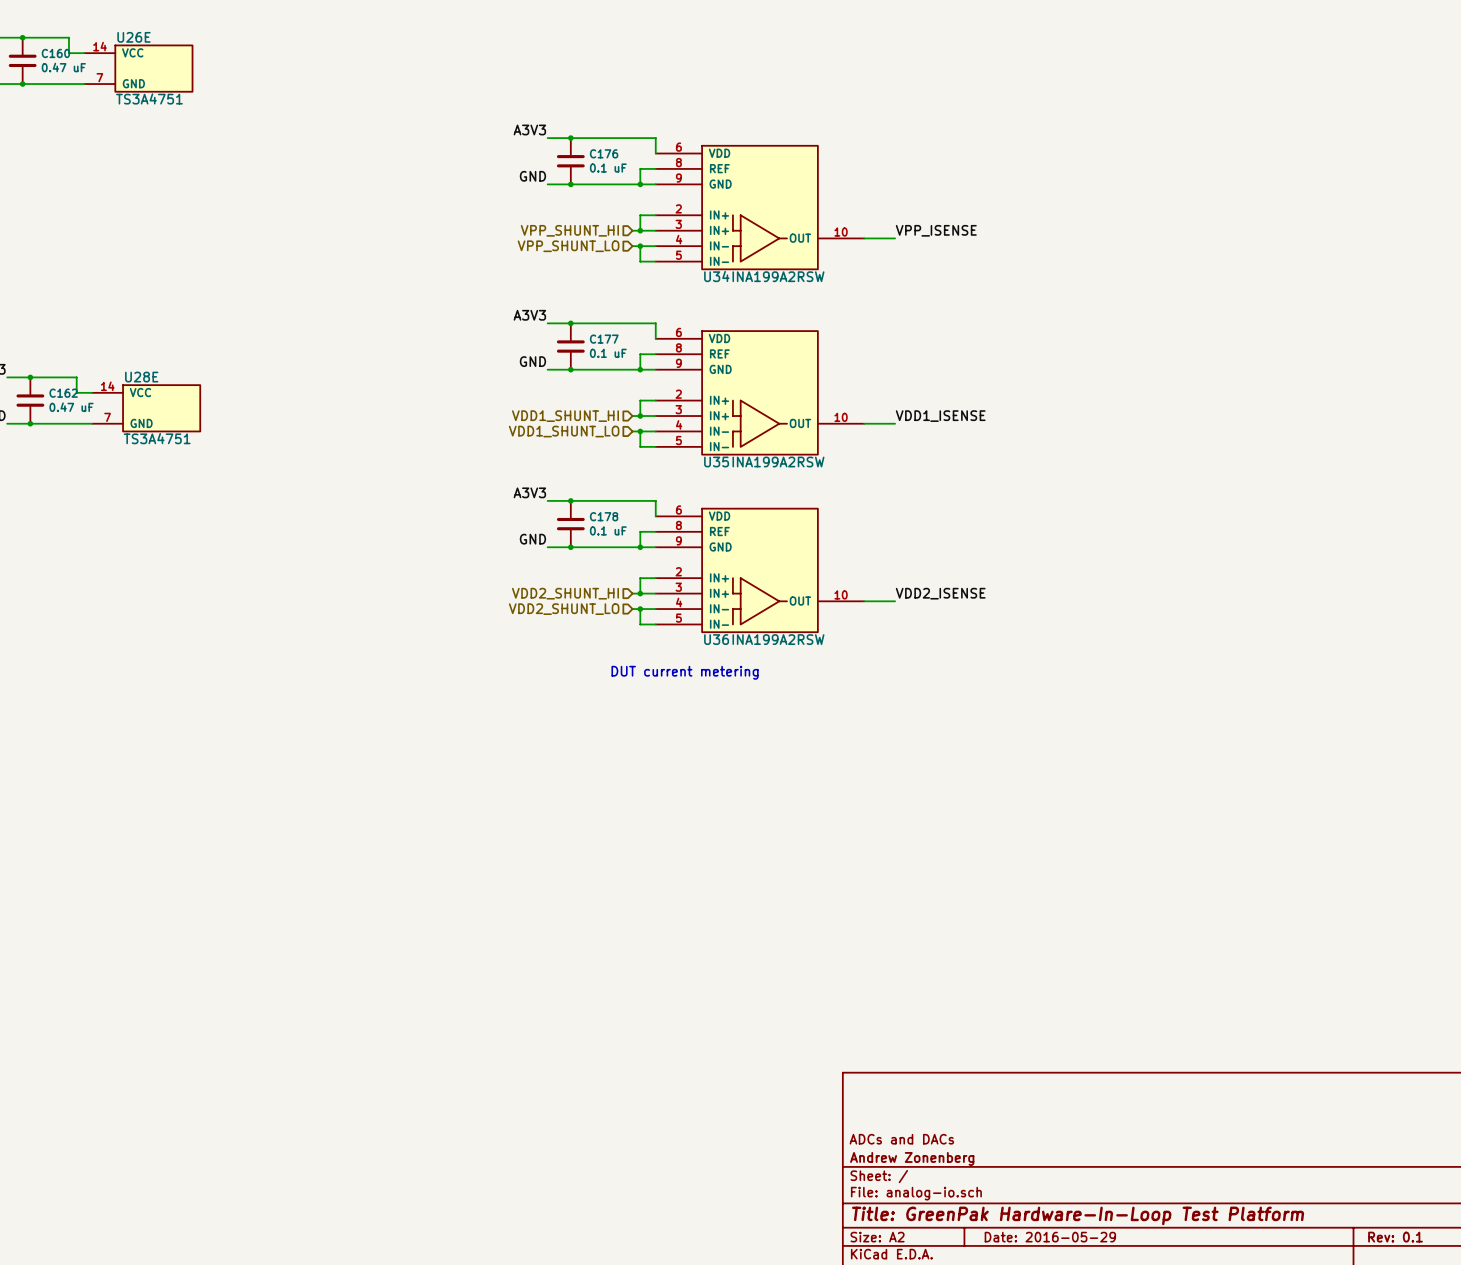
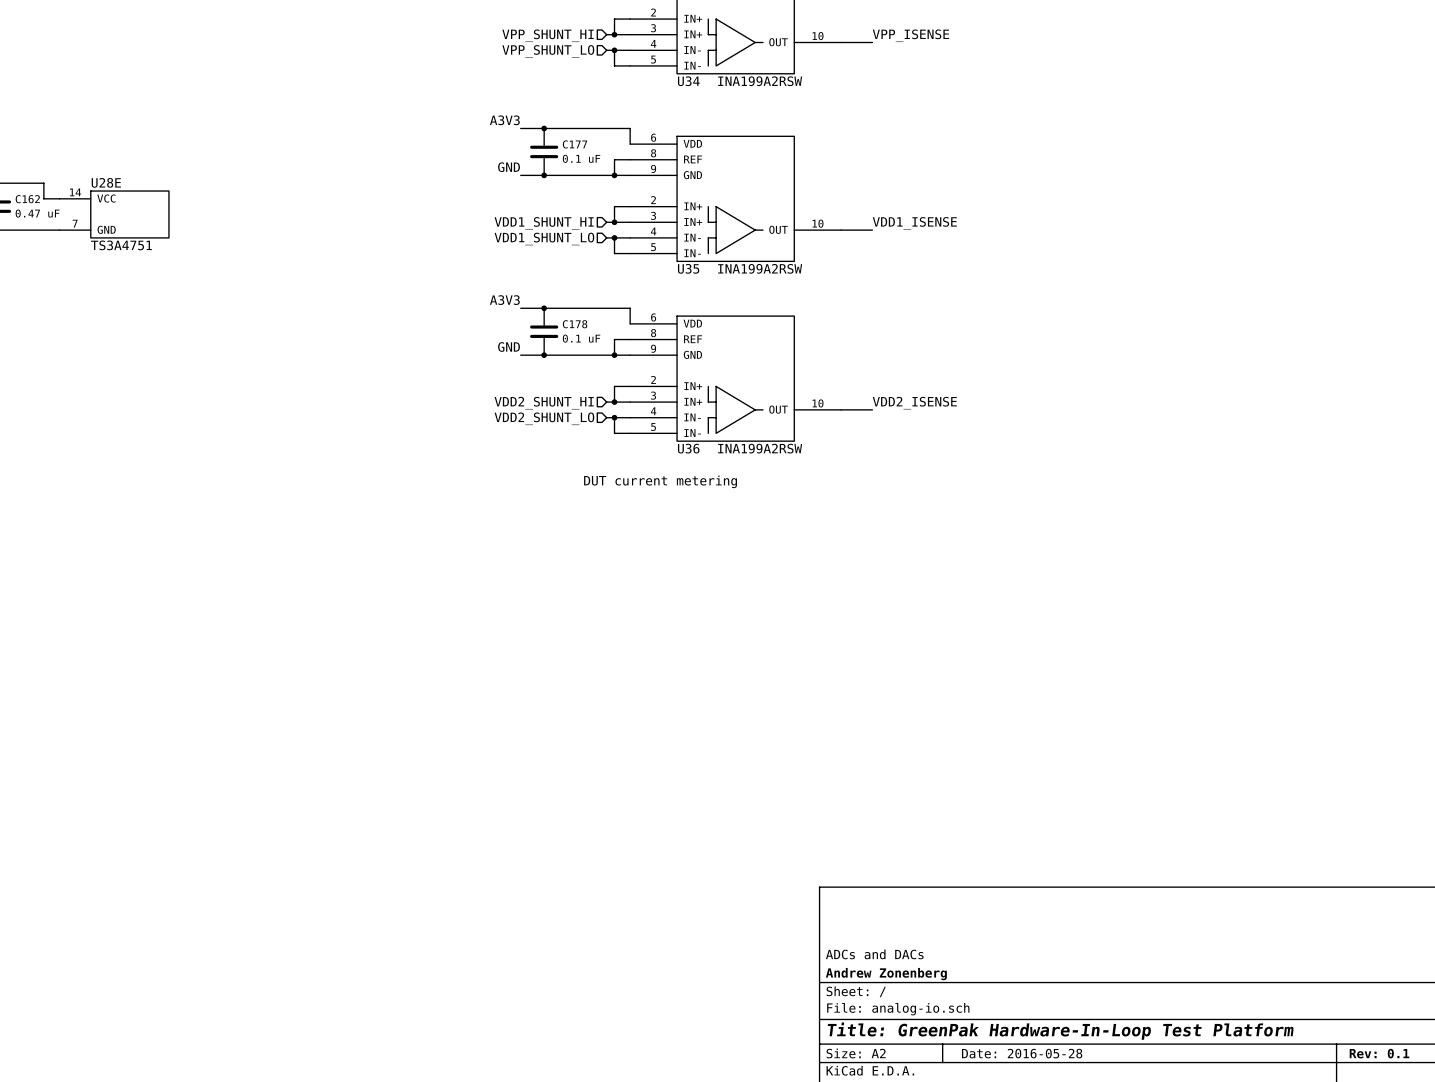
title block: Date: 2016-05-29 (1050, 1237) -> Date: 2016-05-28 (1022, 1053)

